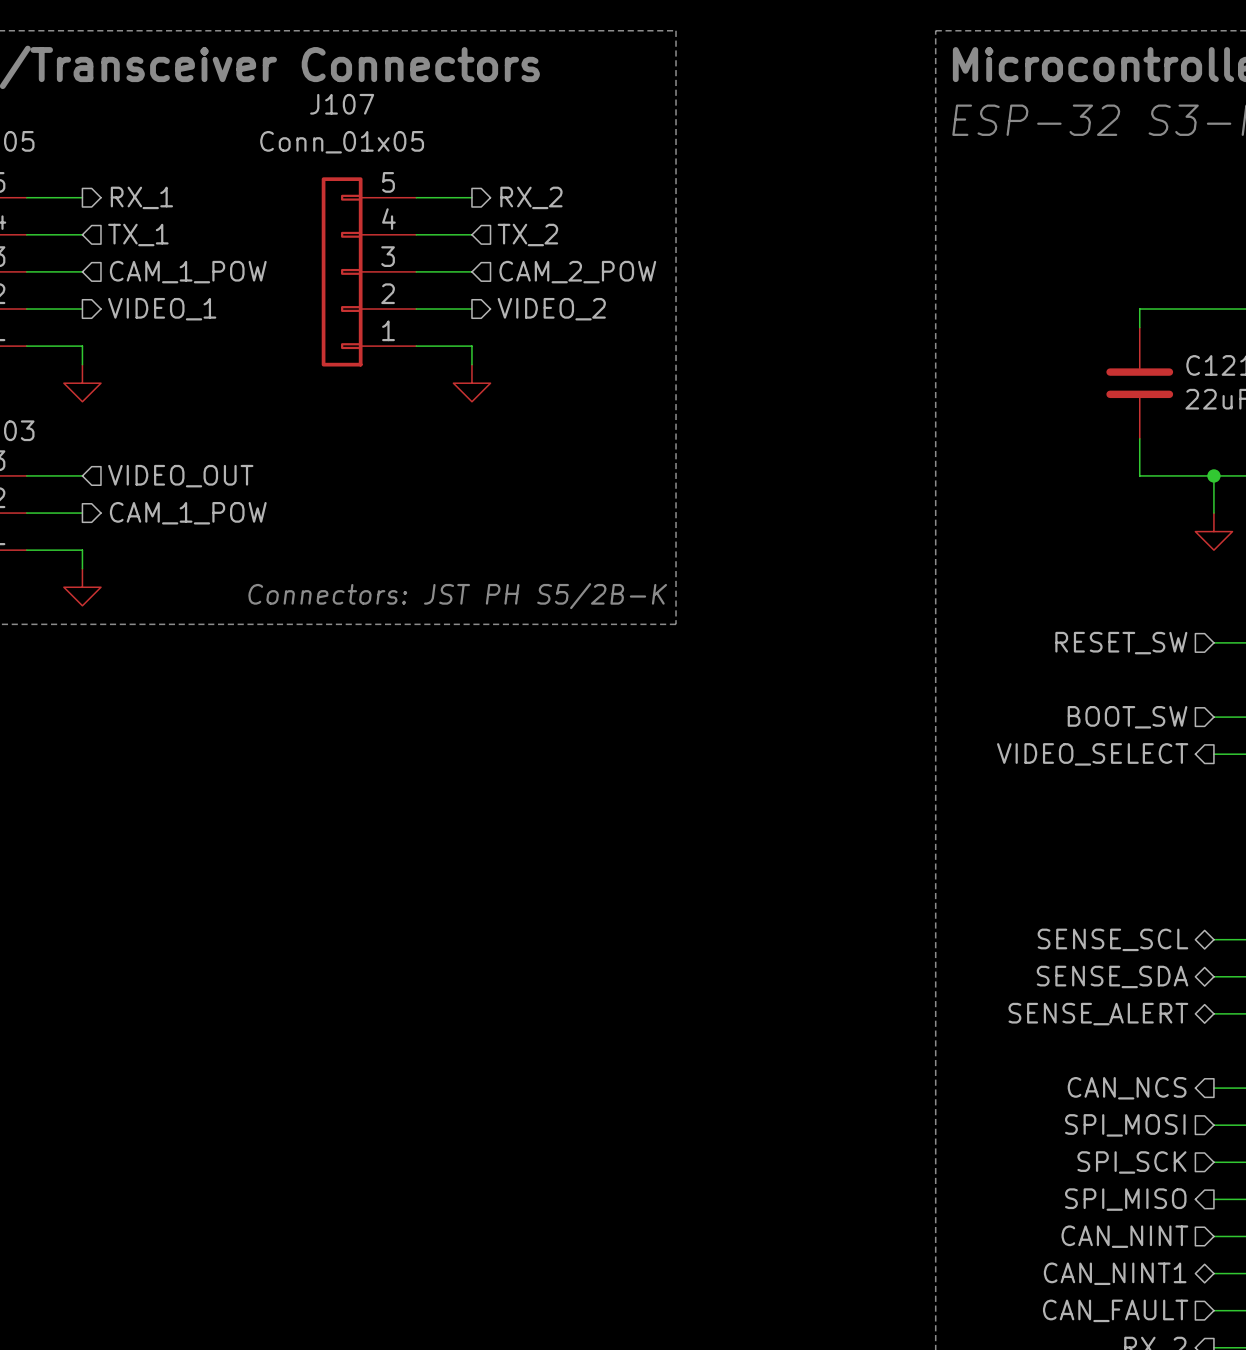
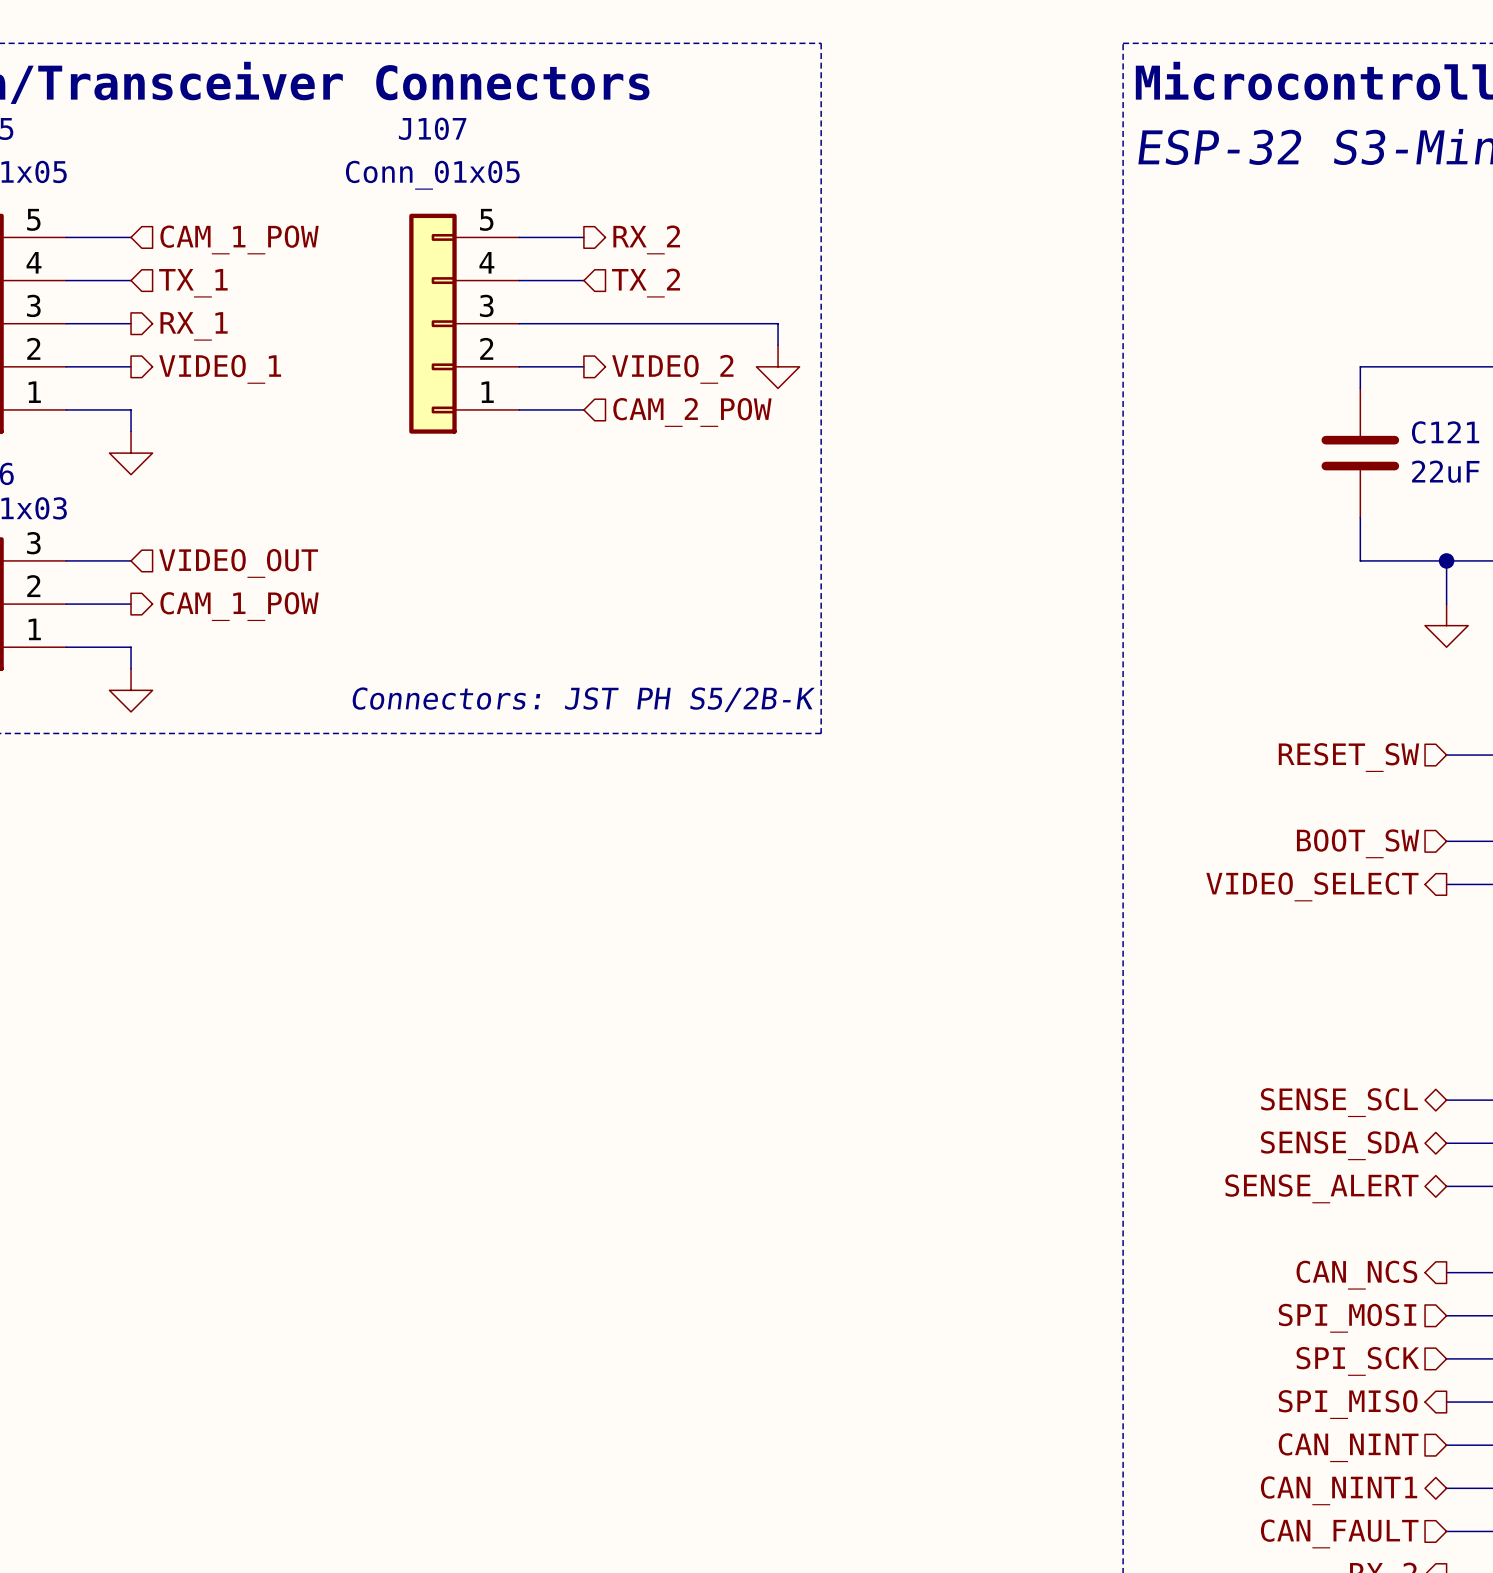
hierarchical label shape: output (141, 197) -> input (239, 239)
hierarchical label: RX_1 (141, 197) -> CAM_1_POW (239, 239)
wire: none -> (583, 323) (778, 323) (778, 345)
hierarchical label shape: input (188, 272) -> output (194, 326)
hierarchical label: CAM_1_POW (188, 272) -> RX_1 (194, 326)
hierarchical label position: CAM_2_POW (577, 272) -> CAM_2_POW (692, 412)
wire: (471, 346) (471, 364) -> none
power symbol position: (471, 383) -> (778, 366)

